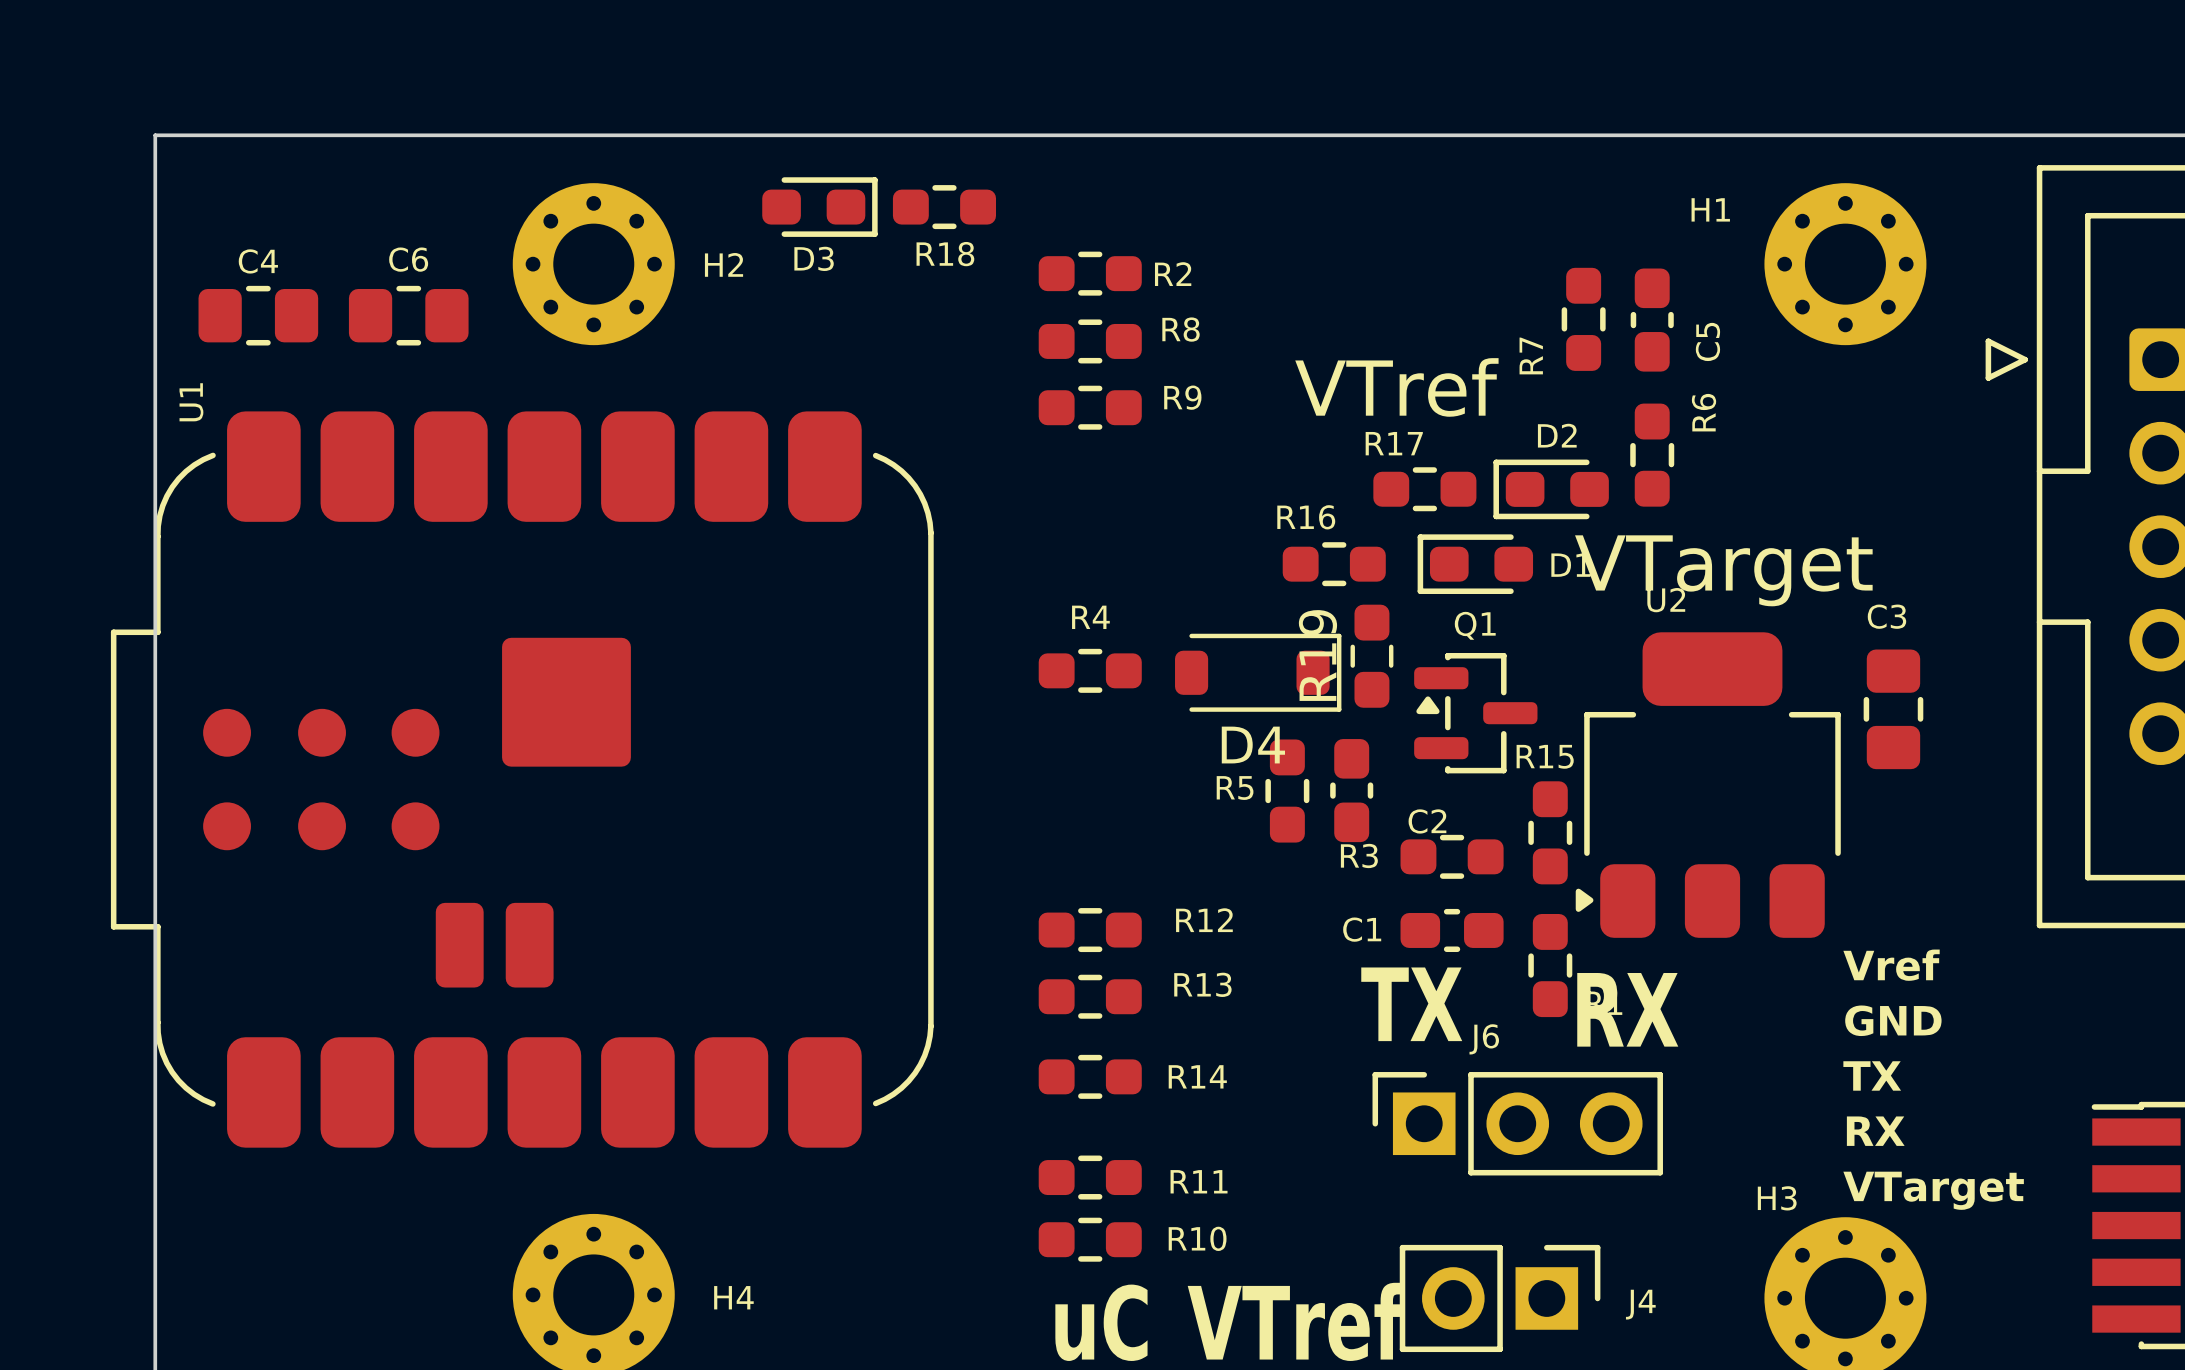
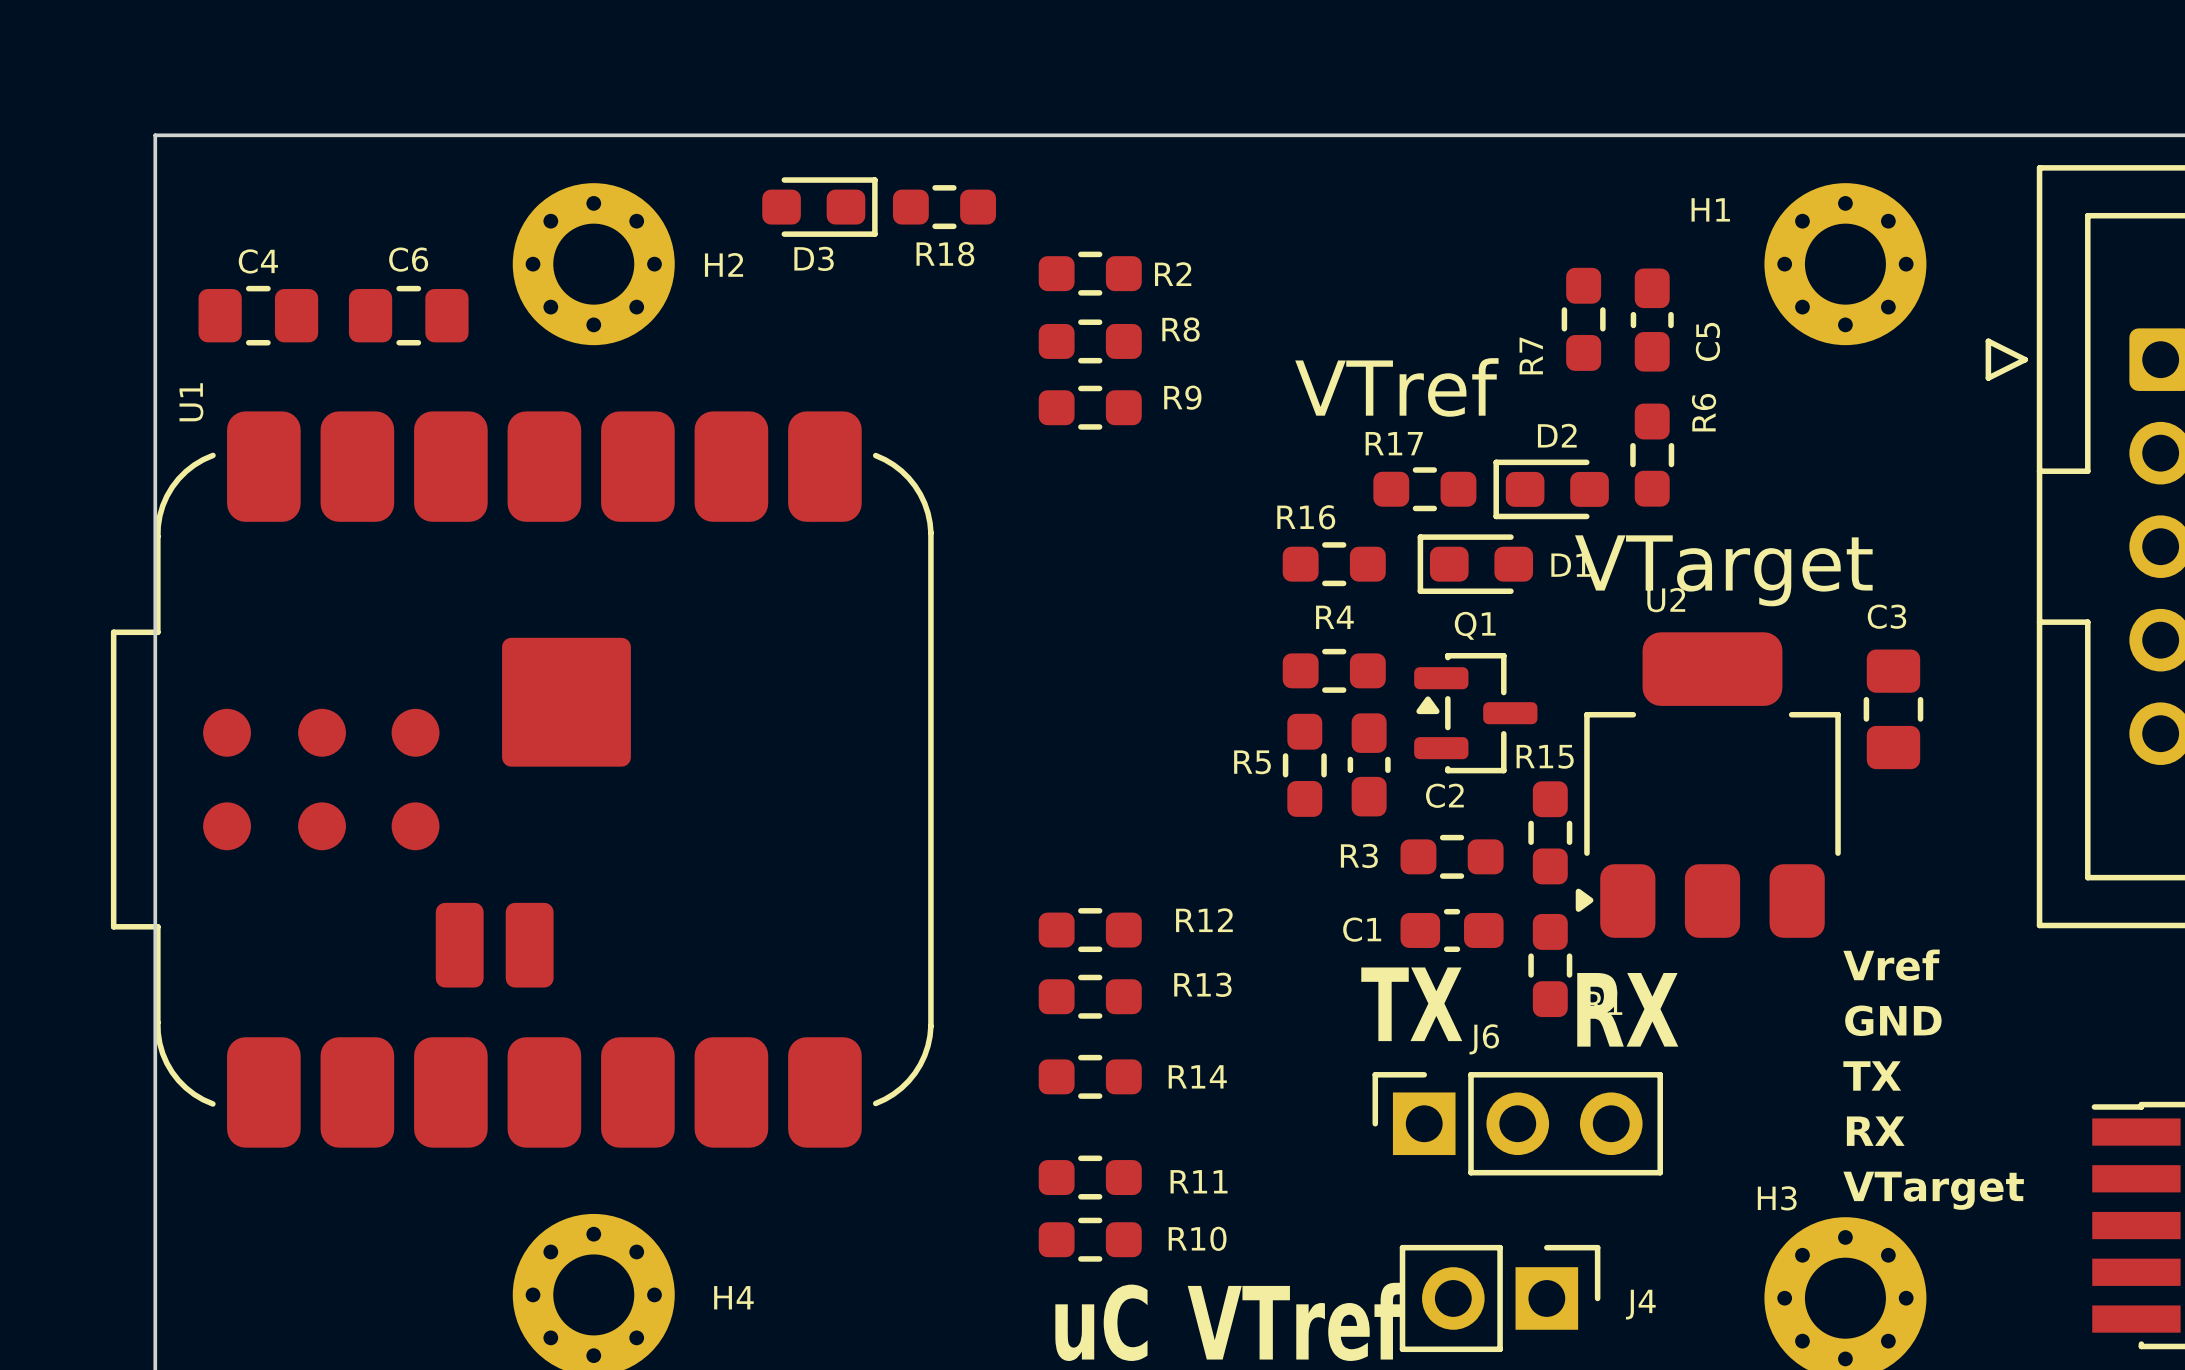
R19: (1371, 656) -> none
R4 position: (1090, 670) -> (1334, 670)
D4: (1258, 672) -> none
C2 position: (1351, 790) -> (1369, 764)
R5 position: (1287, 791) -> (1304, 765)

